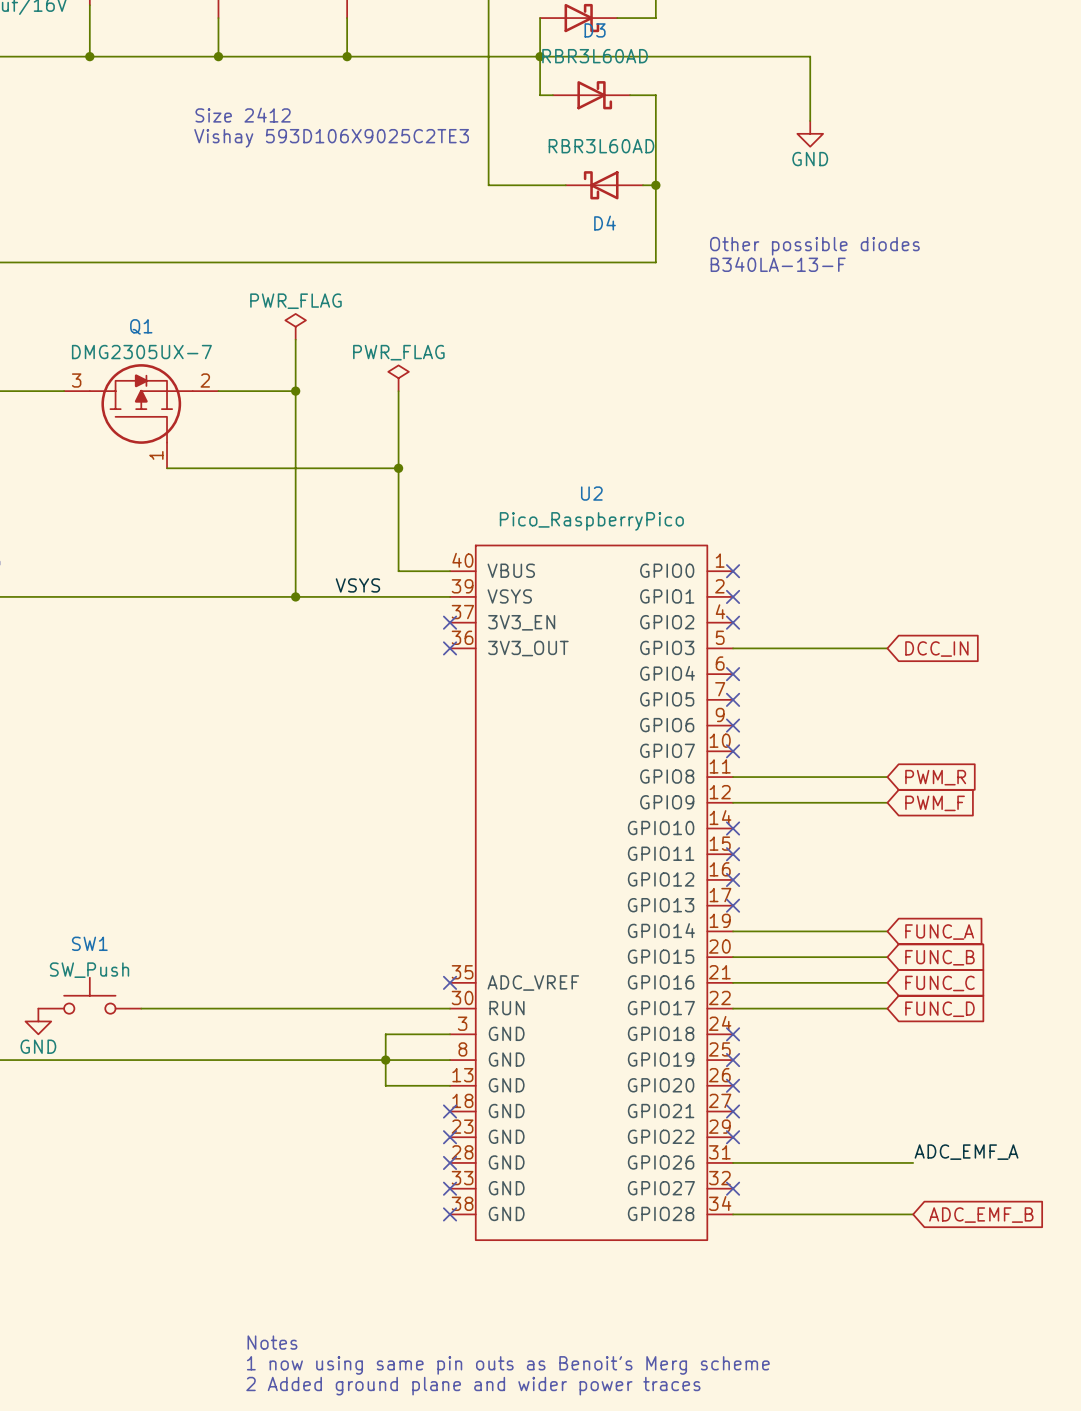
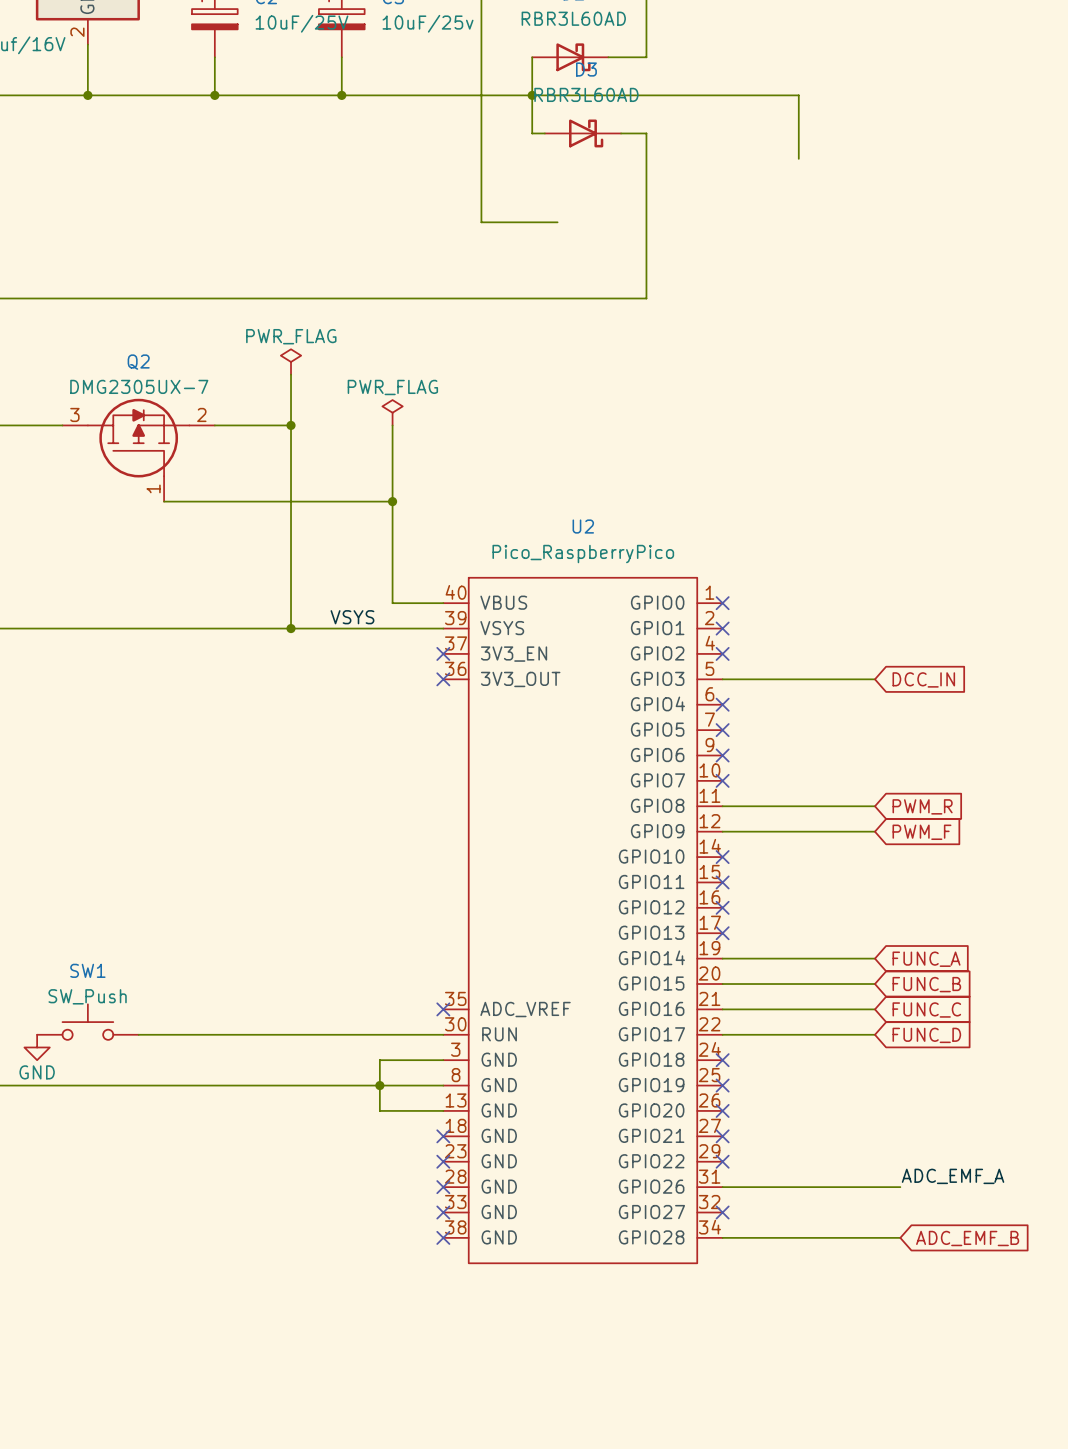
text: Size 2412 (243, 115) -> none
power symbol: GND (810, 133) -> none
text: Vishay 593D106X9025C2TE3 (331, 138) -> none
D4: RBR3L60AD (604, 185) -> none
wire: (642, 185) (655, 185) -> none
junction: (655, 185) -> none
text: Other possible diodes (814, 246) -> none
text: B340LA-13-F (778, 264) -> none
Q1 name: Q1 (141, 326) -> Q2 (138, 362)
text: Notes (272, 1342) -> none
text: 1 now using same pin outs as Benoit's Merg scheme (508, 1365) -> none
text: 2 Added ground plane and wider power traces (473, 1386) -> none

